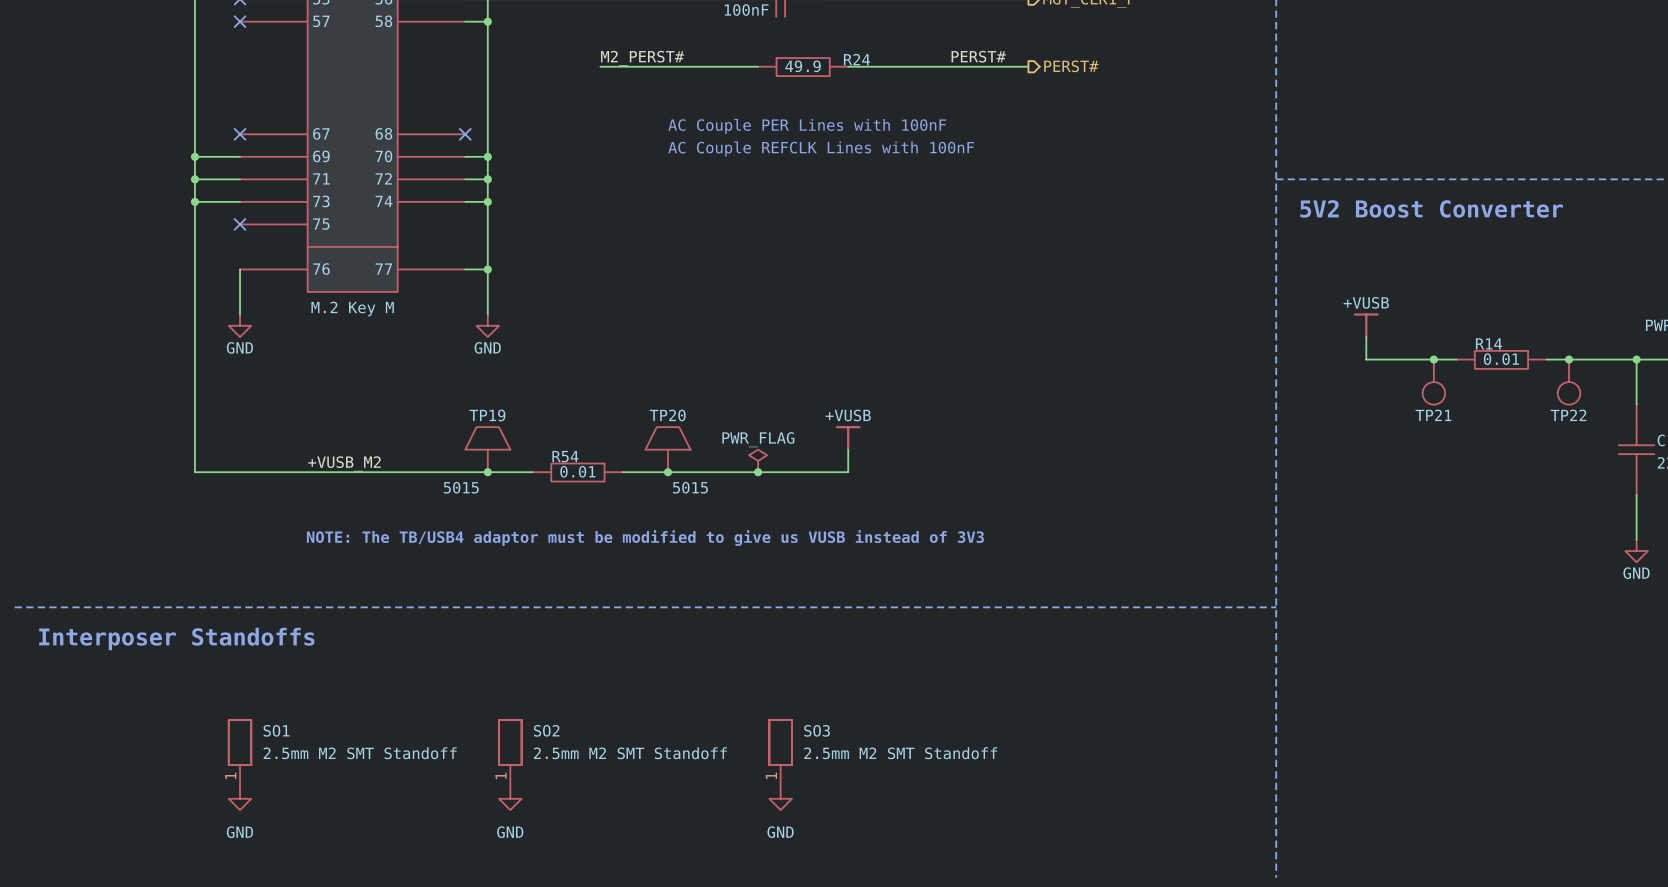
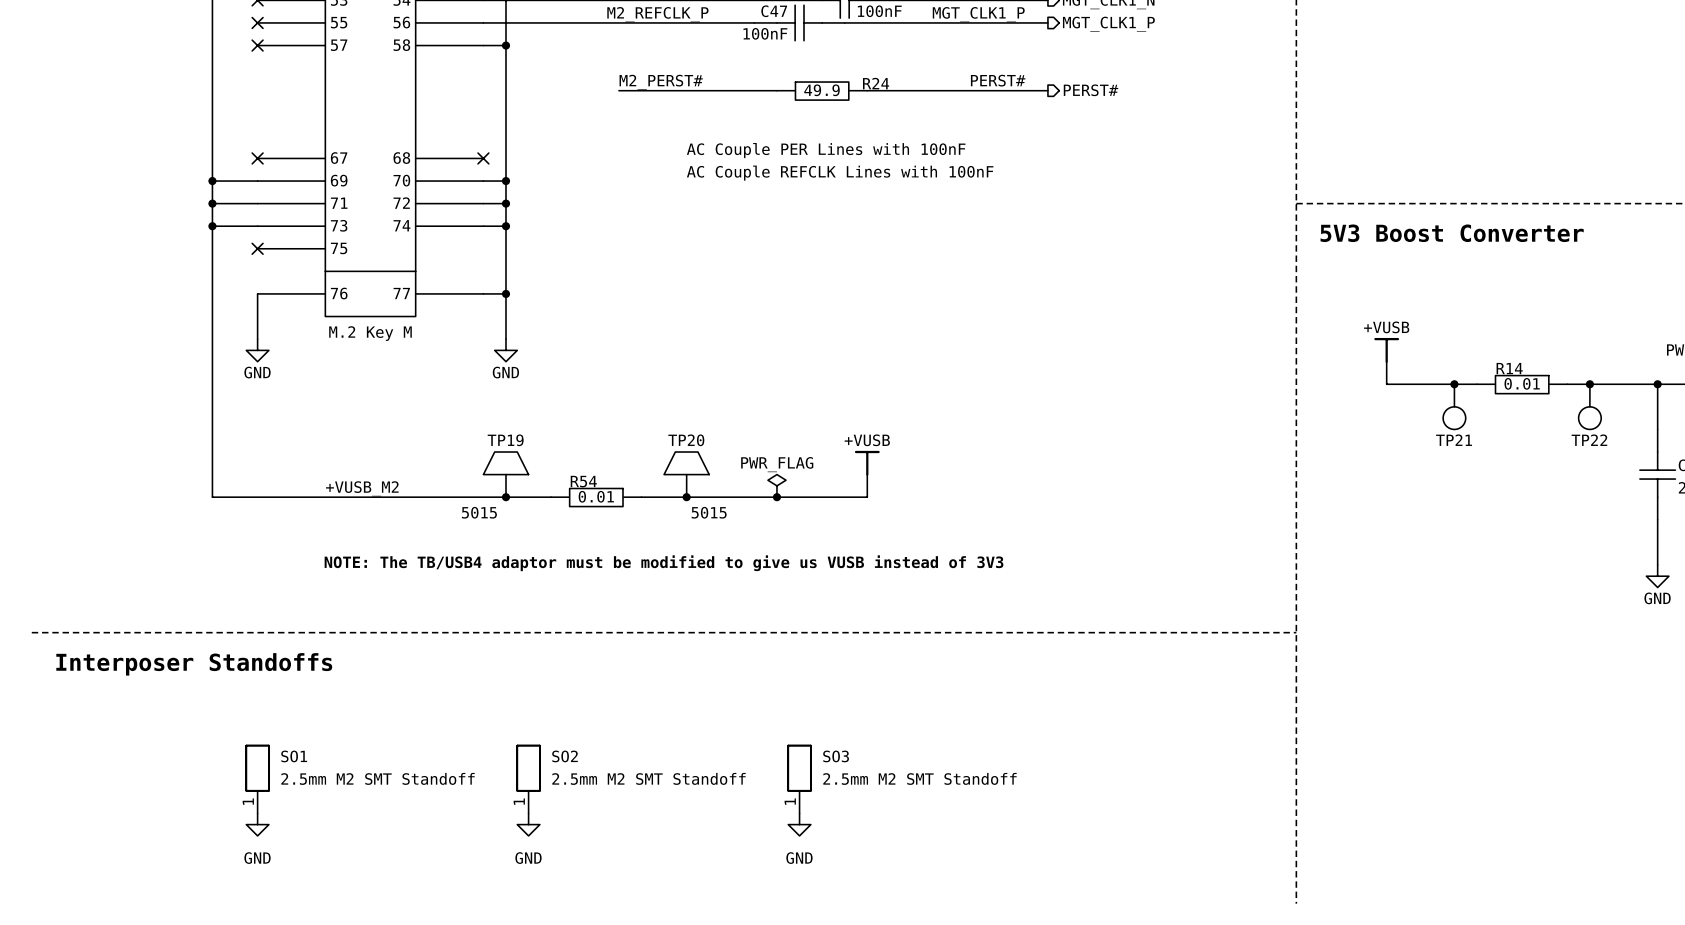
text: 5V2 Boost Converter (1431, 208) -> 5V3 Boost Converter (1452, 233)

